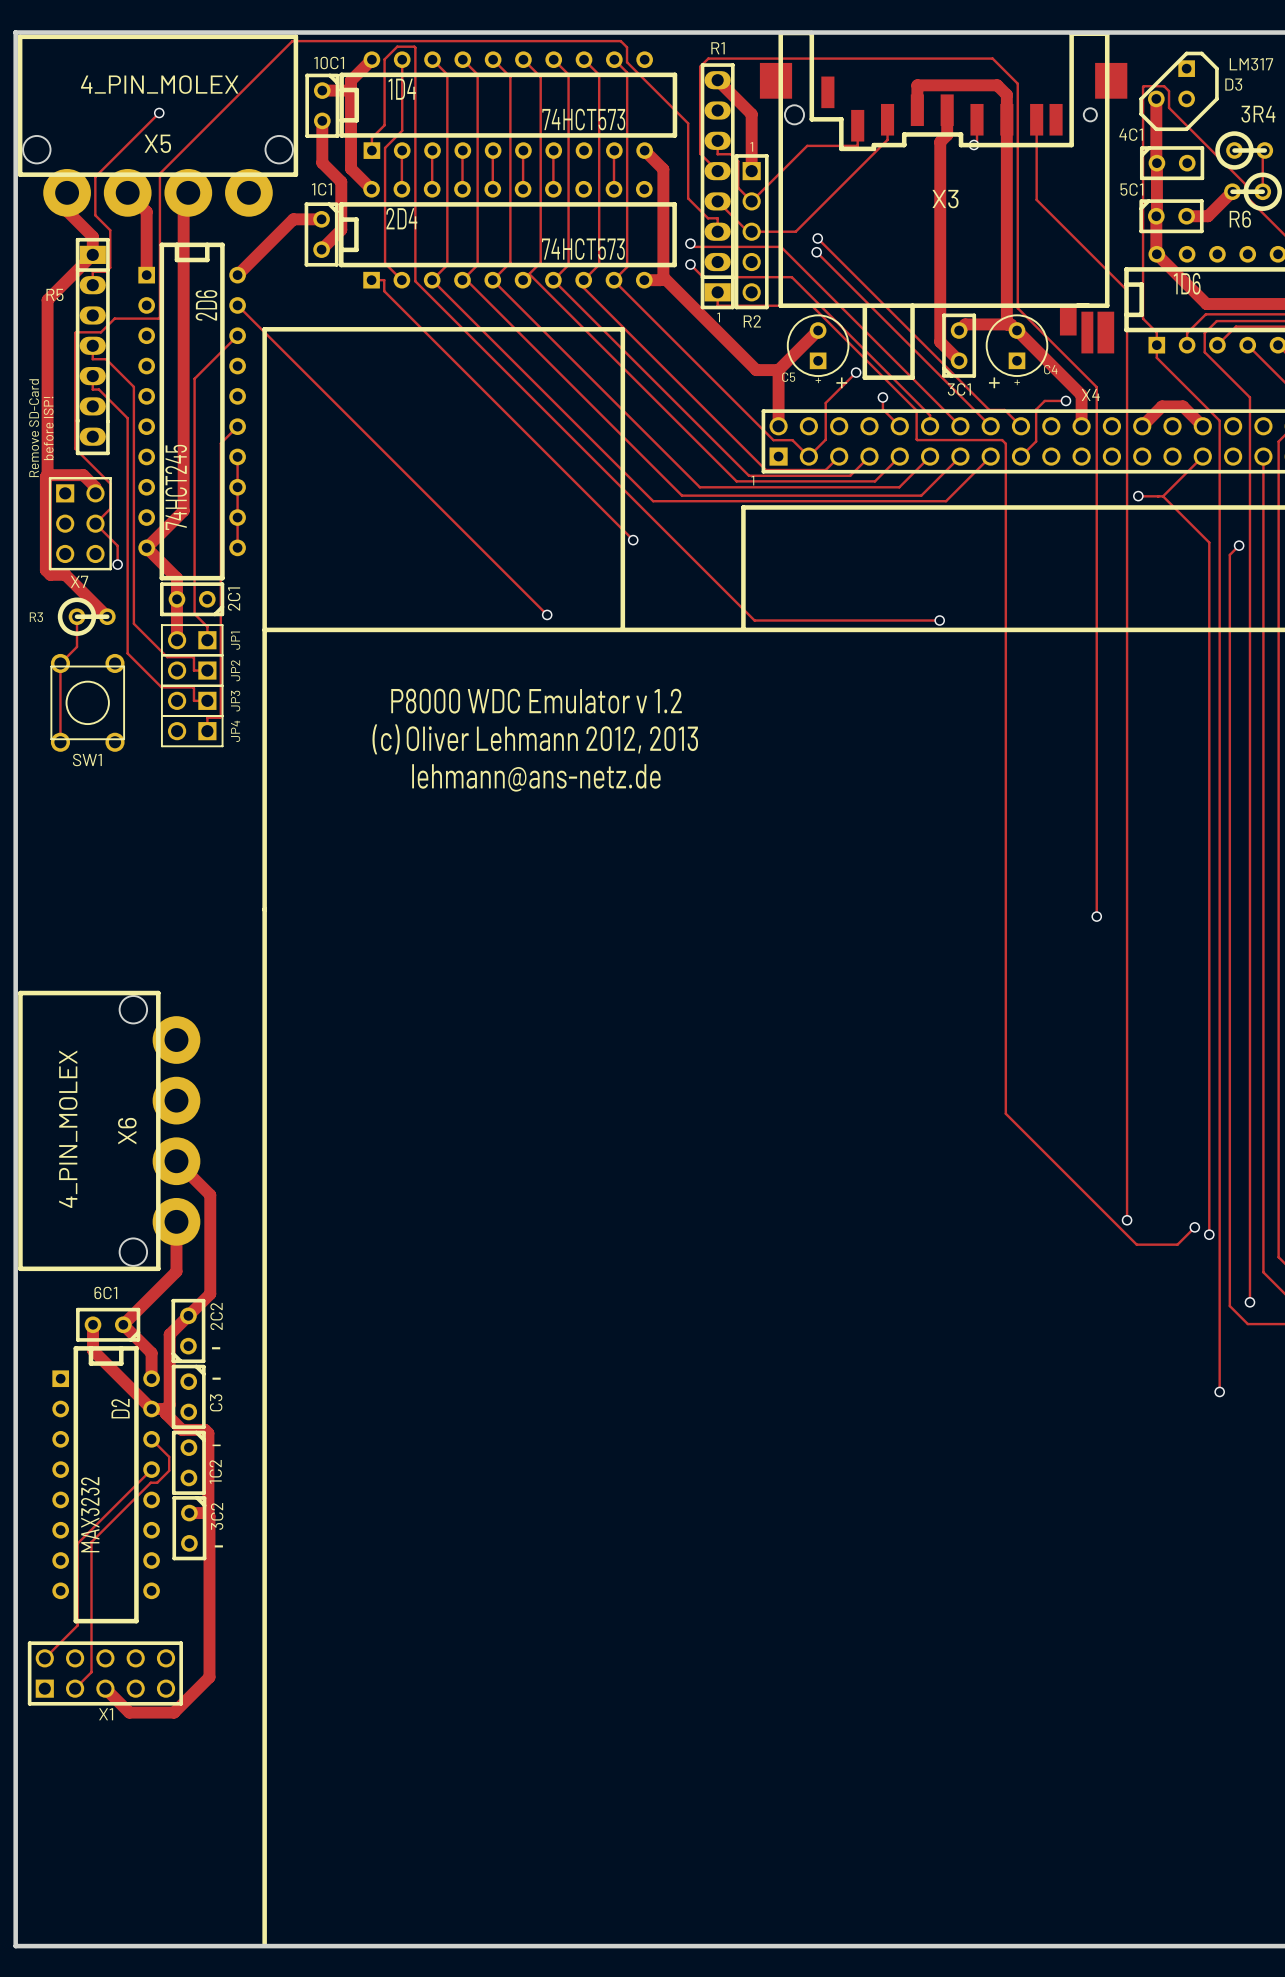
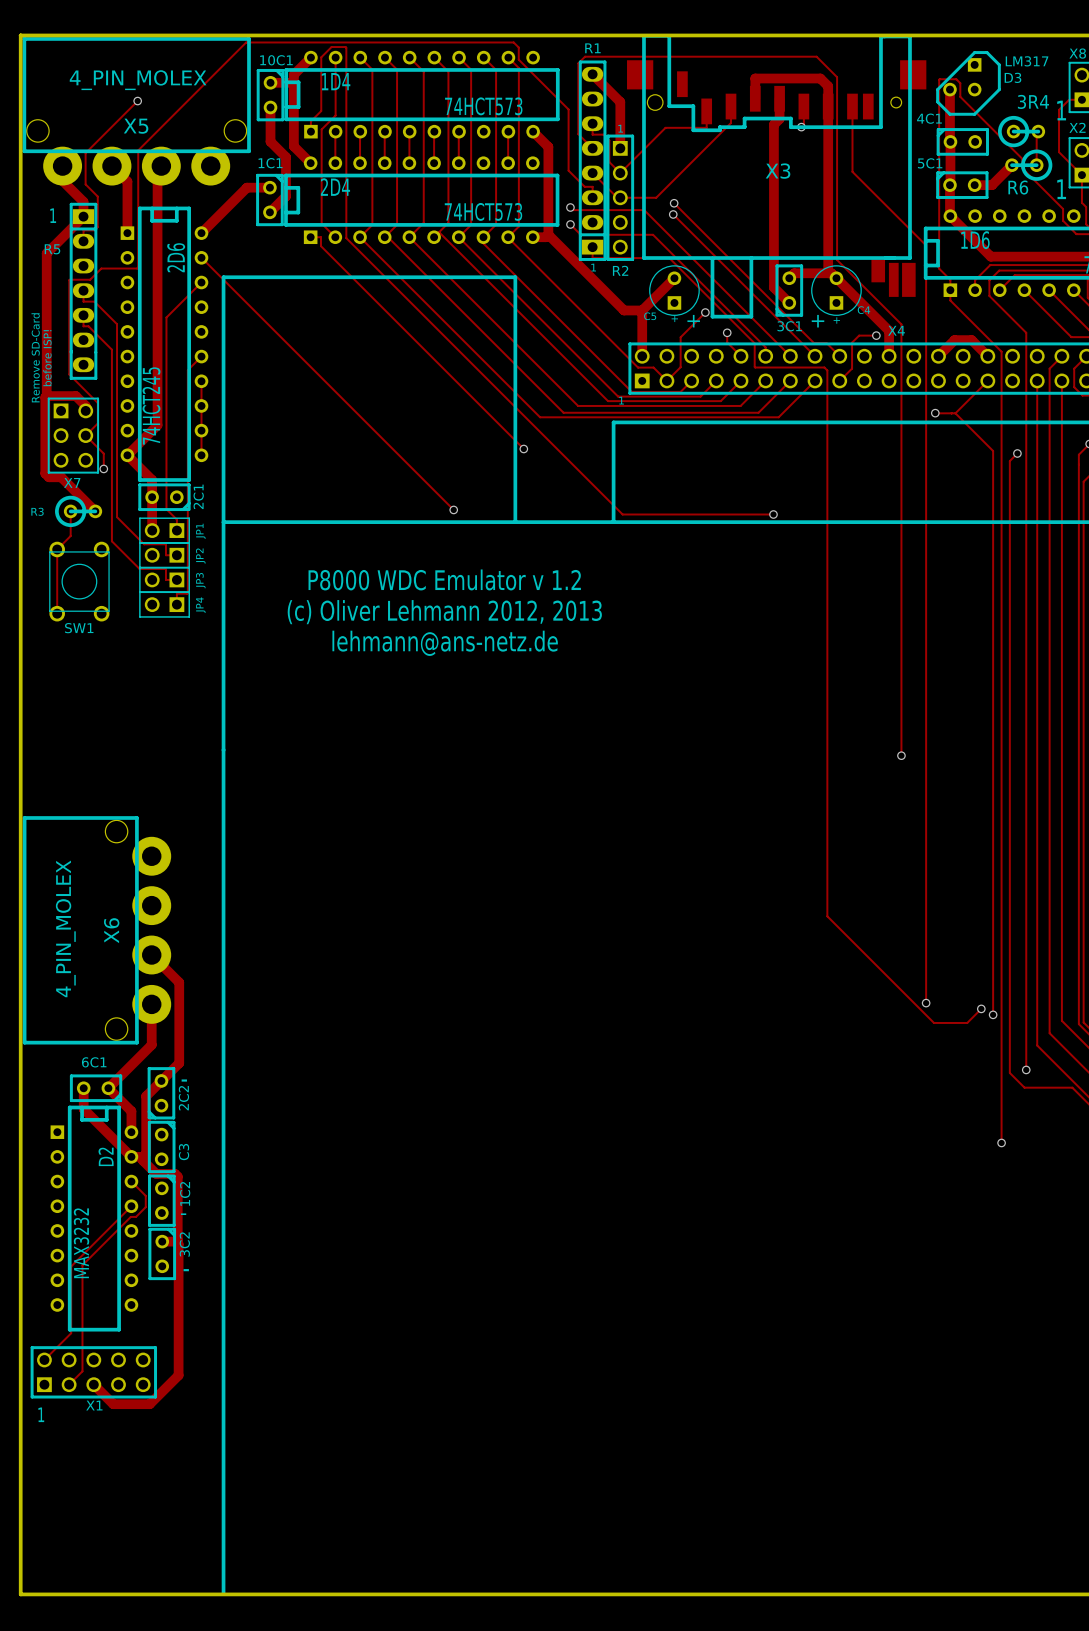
text: none -> 1 (53, 215)
2C2 name position: 2C2 (216, 1316) -> 2C2 (183, 1098)
text position: - (216, 1348) -> - (184, 1080)
text: - (216, 1378) -> none
text position: - (216, 1445) -> - (183, 1214)
1C2 name position: 1C2 (215, 1471) -> 1C2 (185, 1193)
text: none -> 1 (41, 1414)

